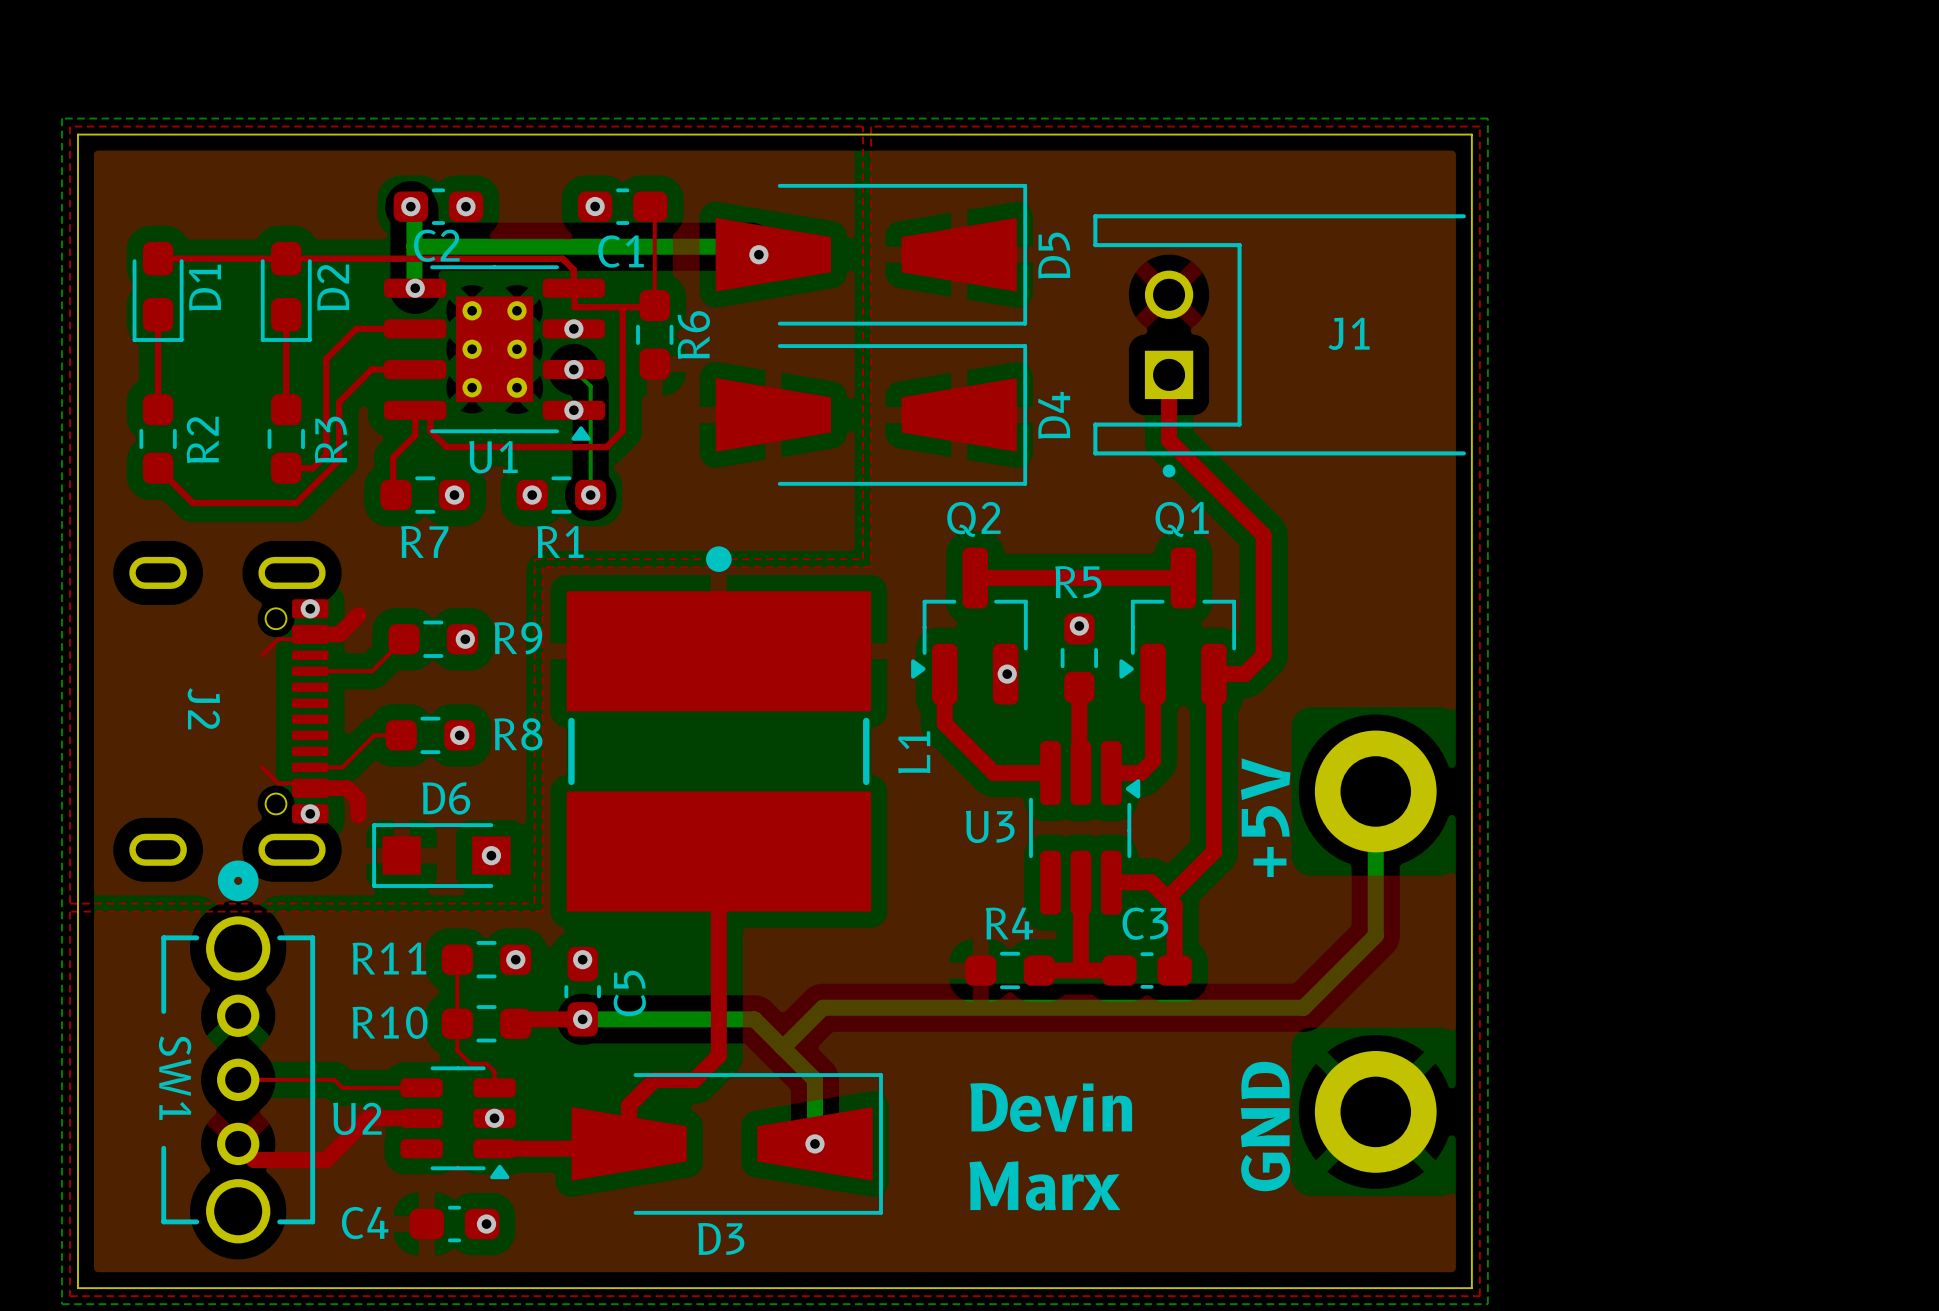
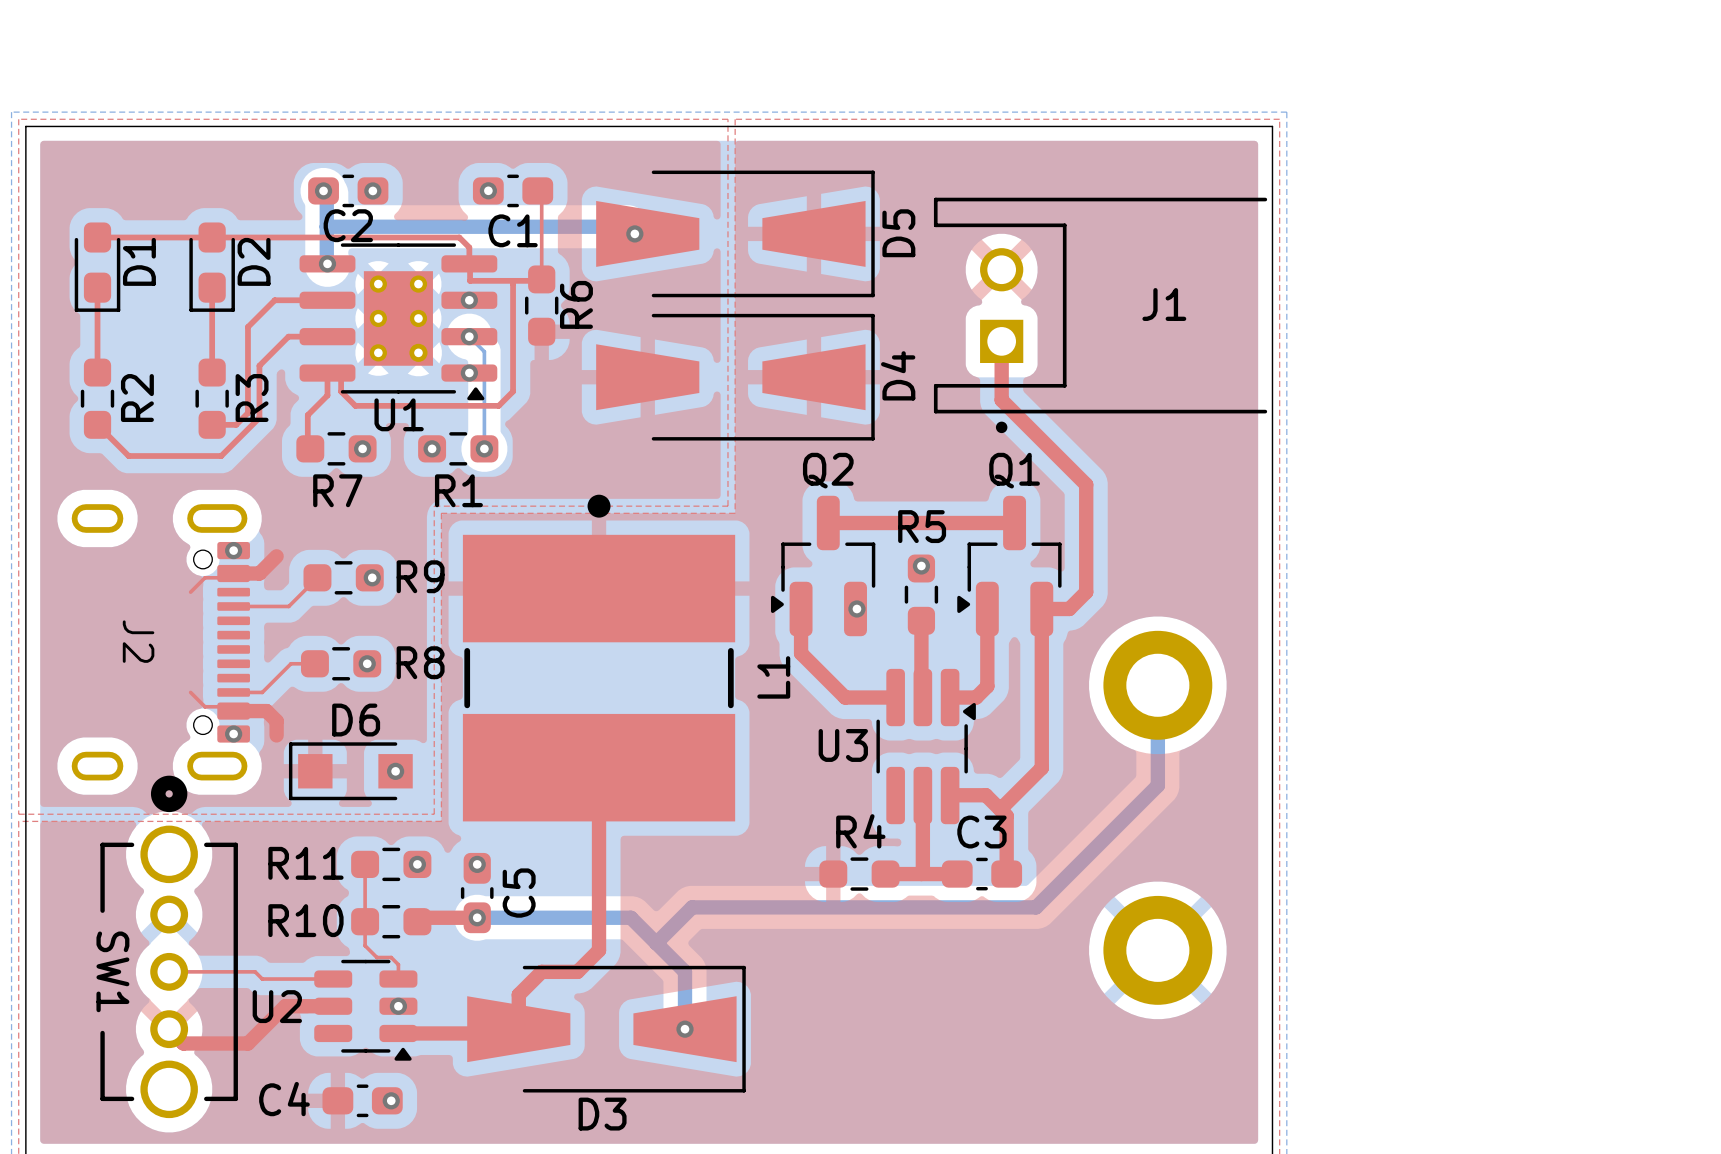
bottom track: (1375, 791) (1375, 935) (1303, 1007) (1207, 1007) -> (1157, 685) (1157, 785) (1036, 907)
part position: (1375, 791) -> (1157, 685)
text: +5V (1265, 817) -> none
text: Devin (1051, 1107) -> none
part position: (1375, 1111) -> (1157, 950)
text: GND (1265, 1126) -> none
text: Marx (1044, 1185) -> none

